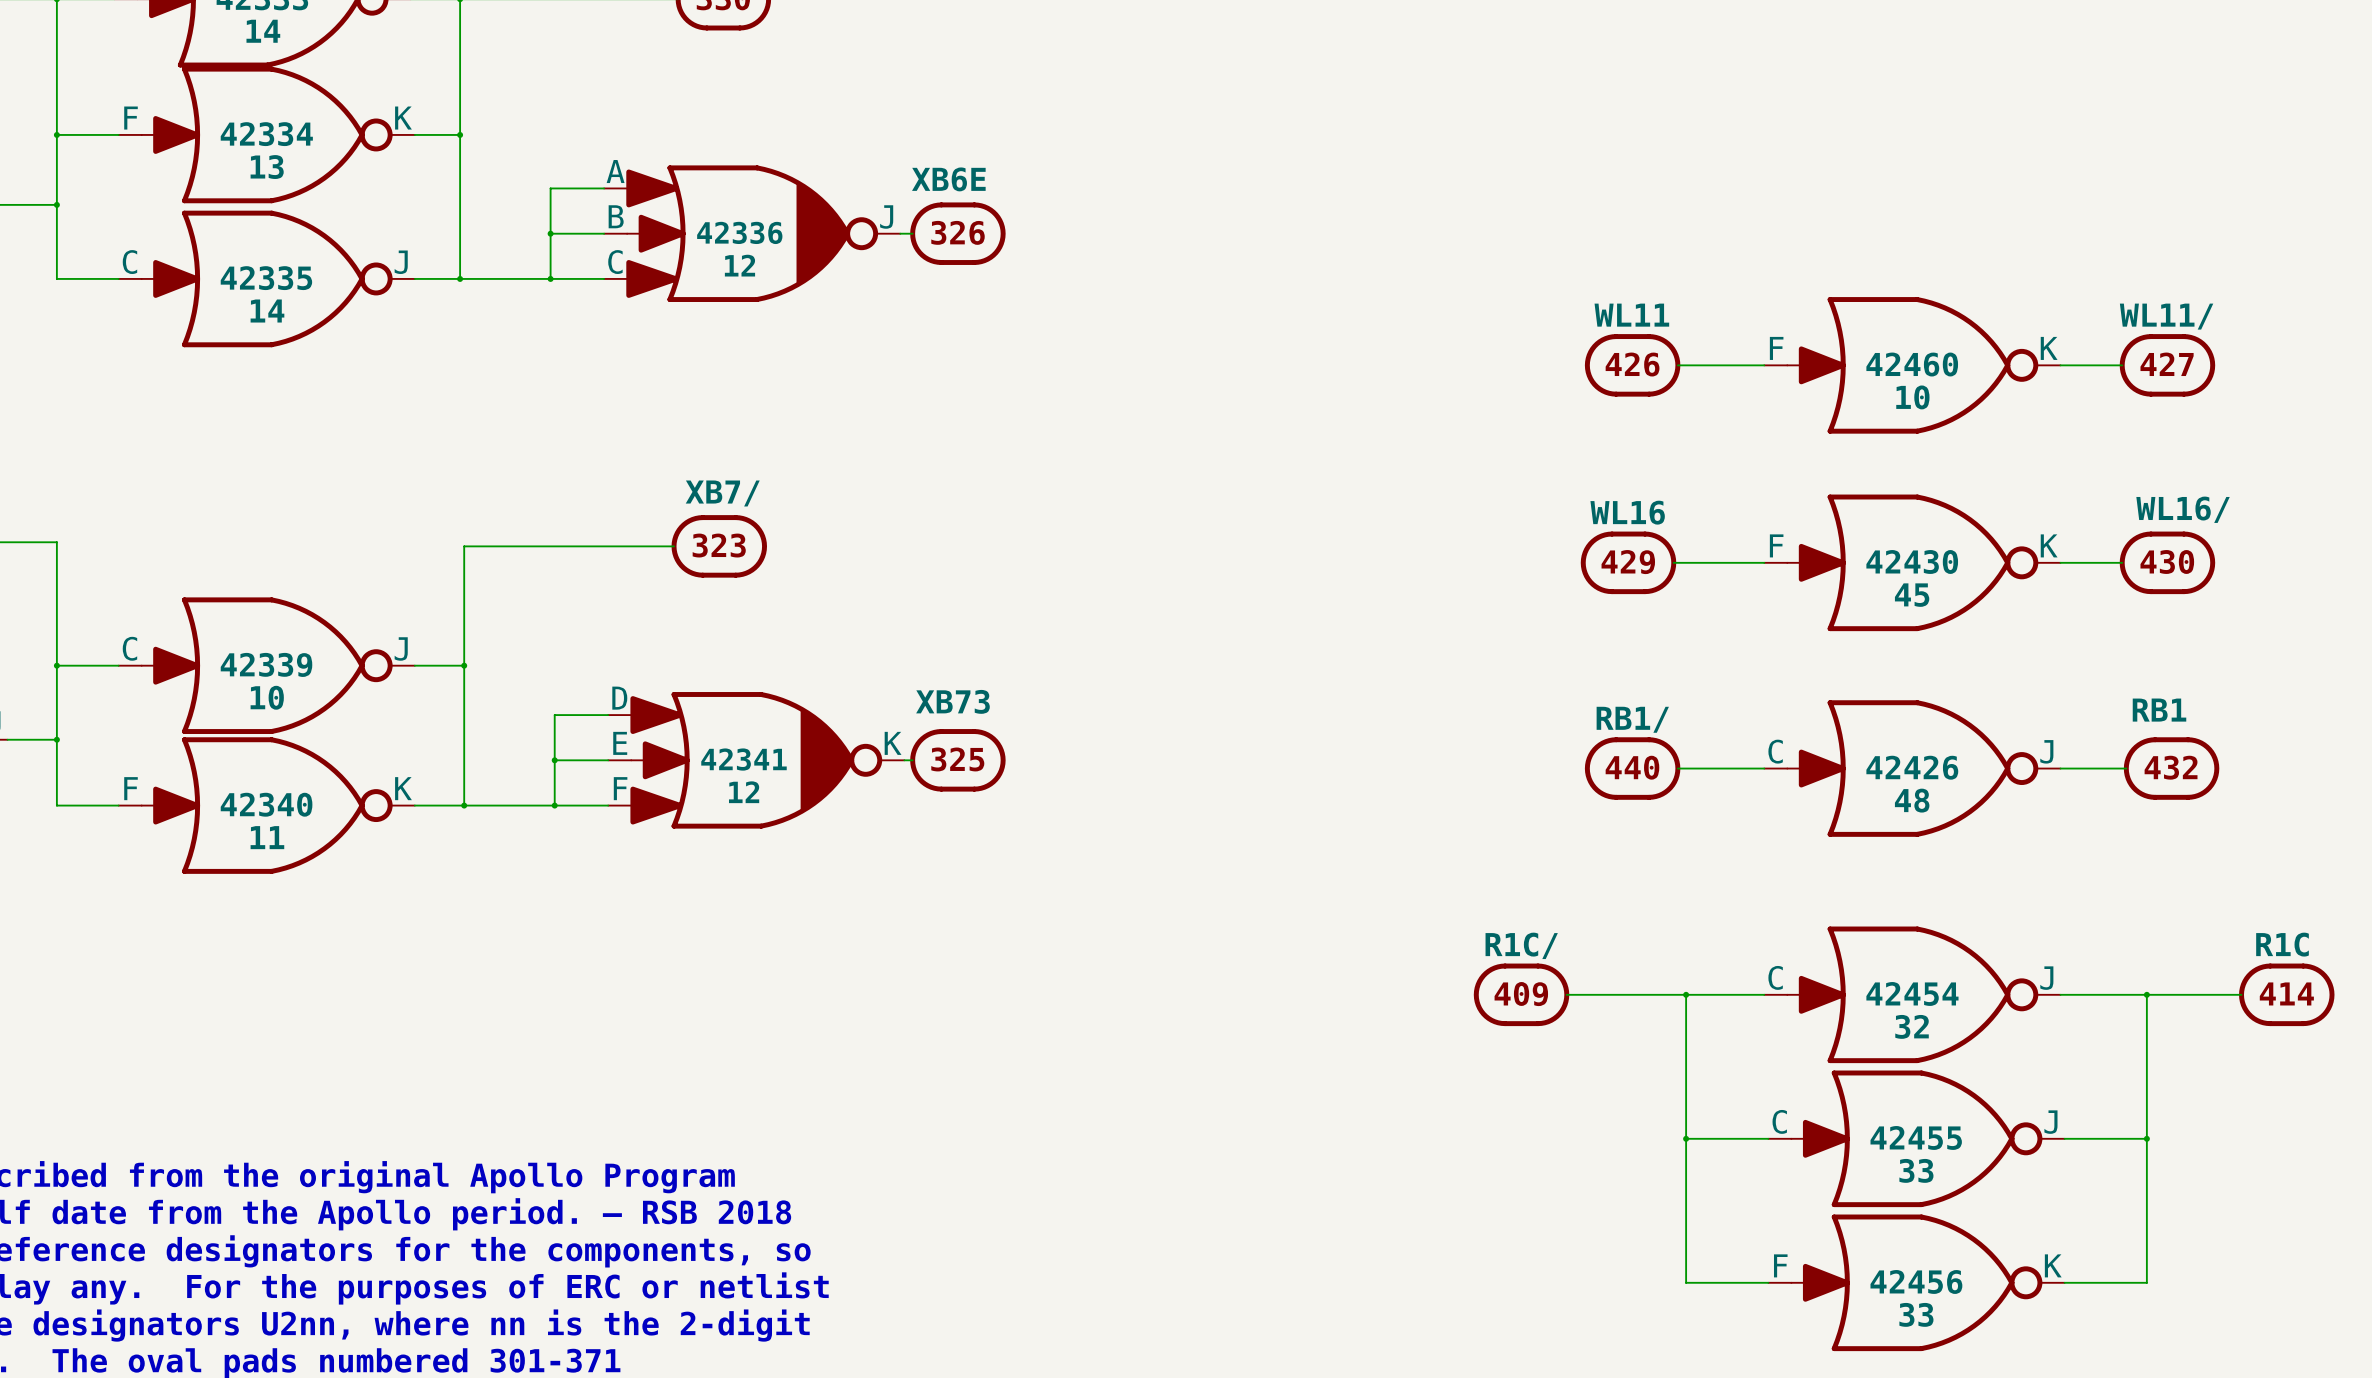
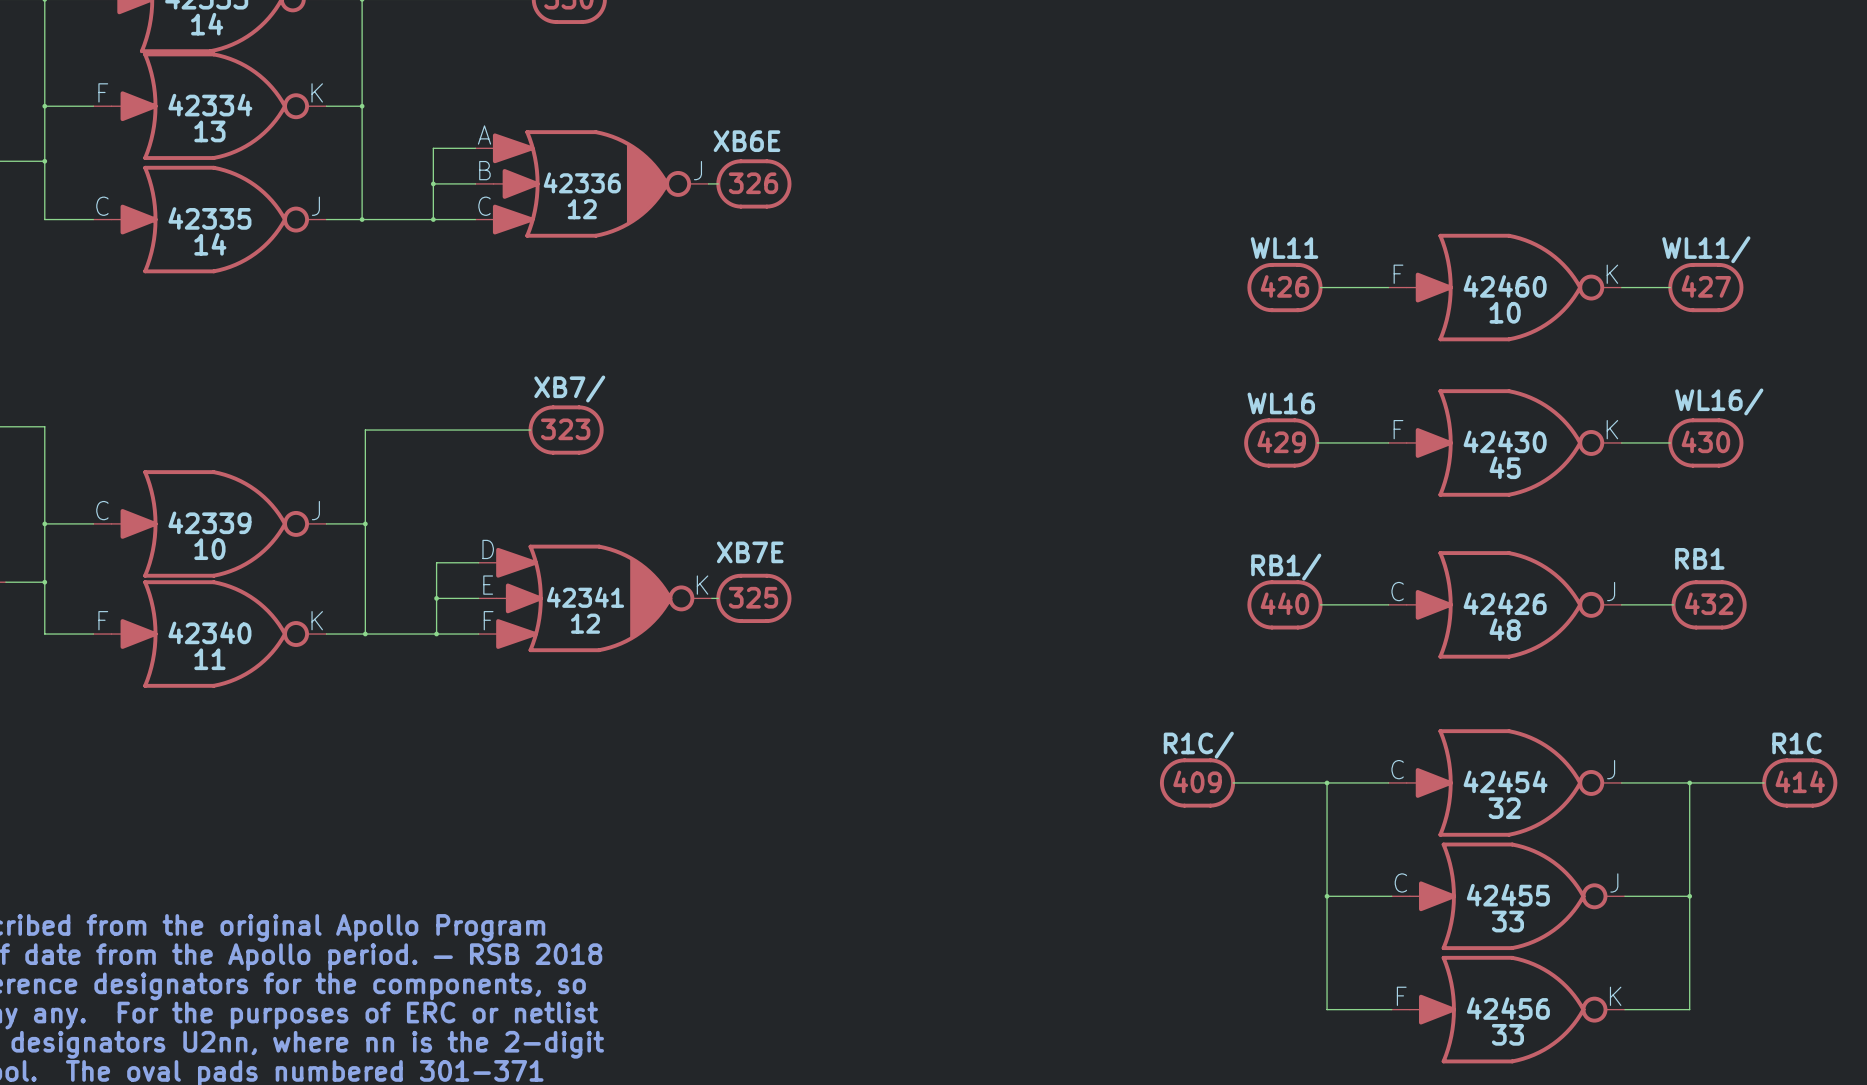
part text: XB73 (952, 701) -> XB7E (750, 552)

